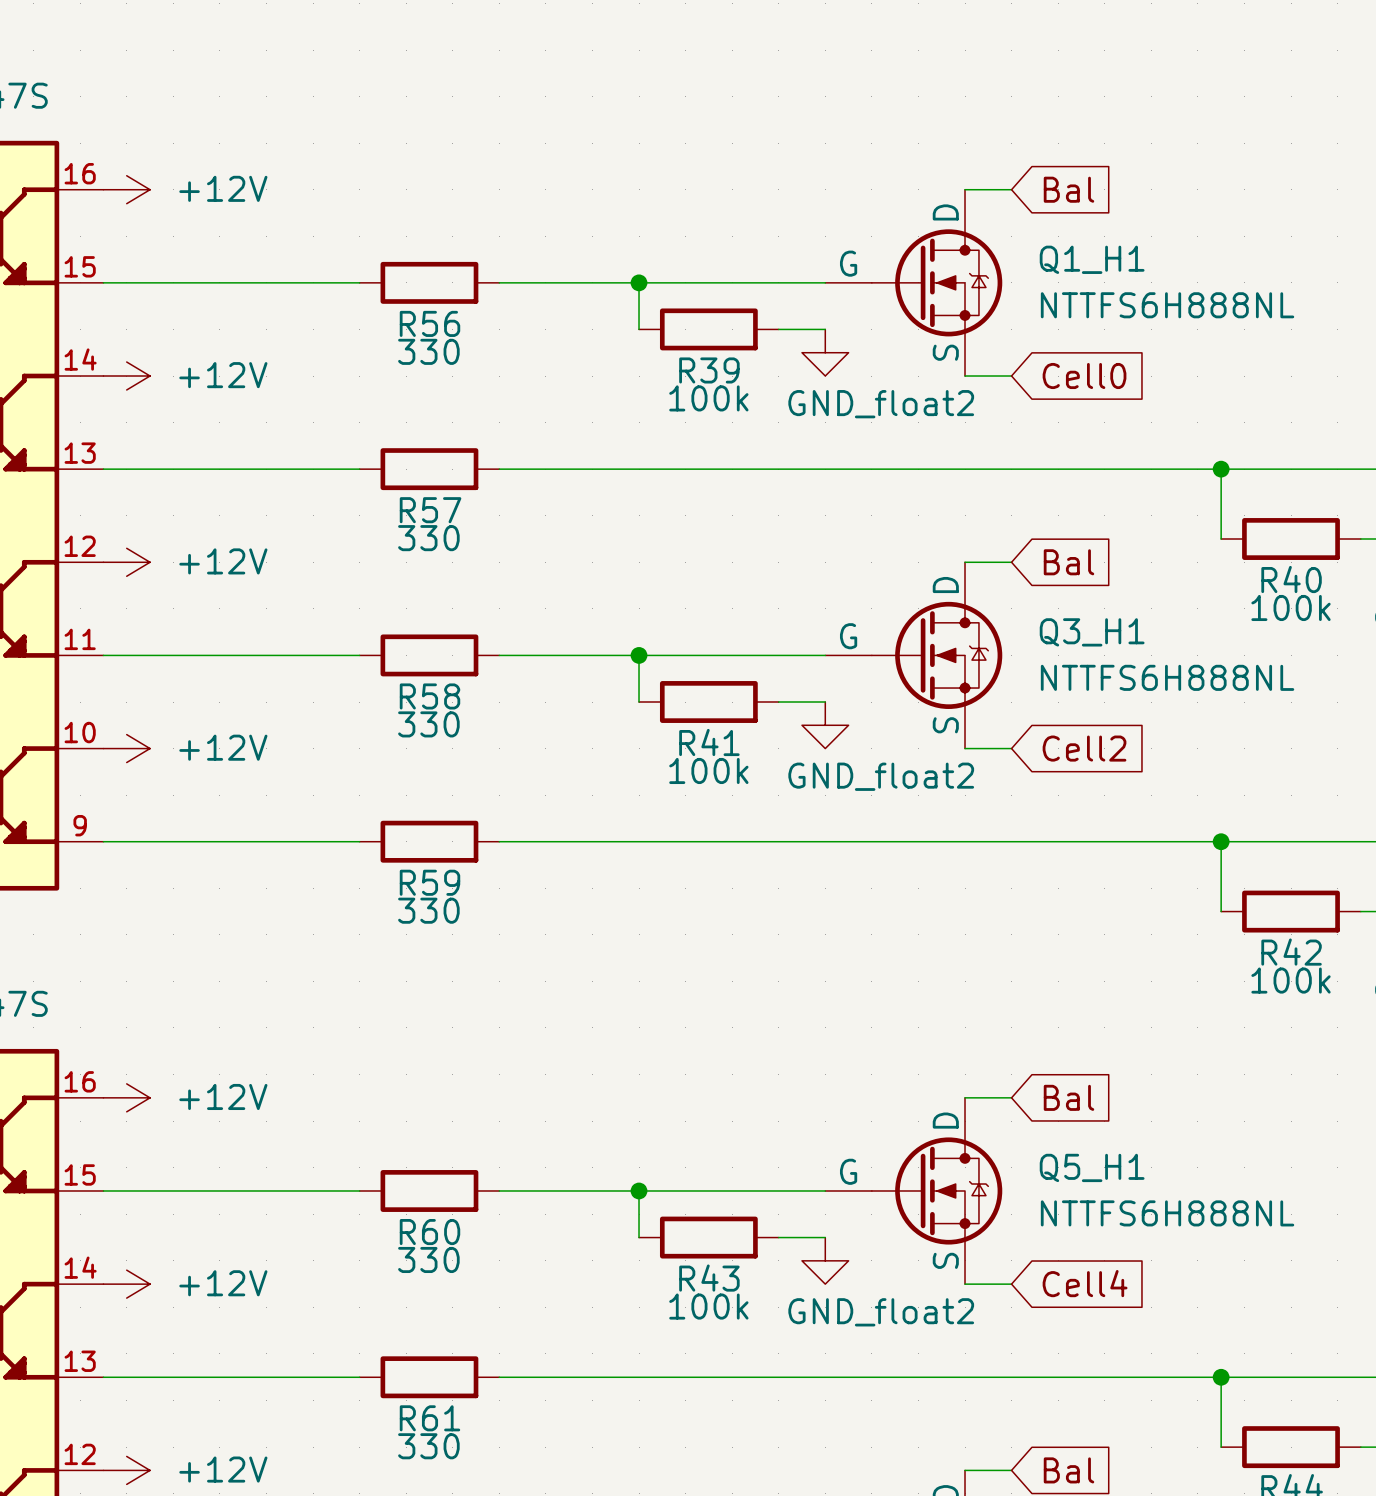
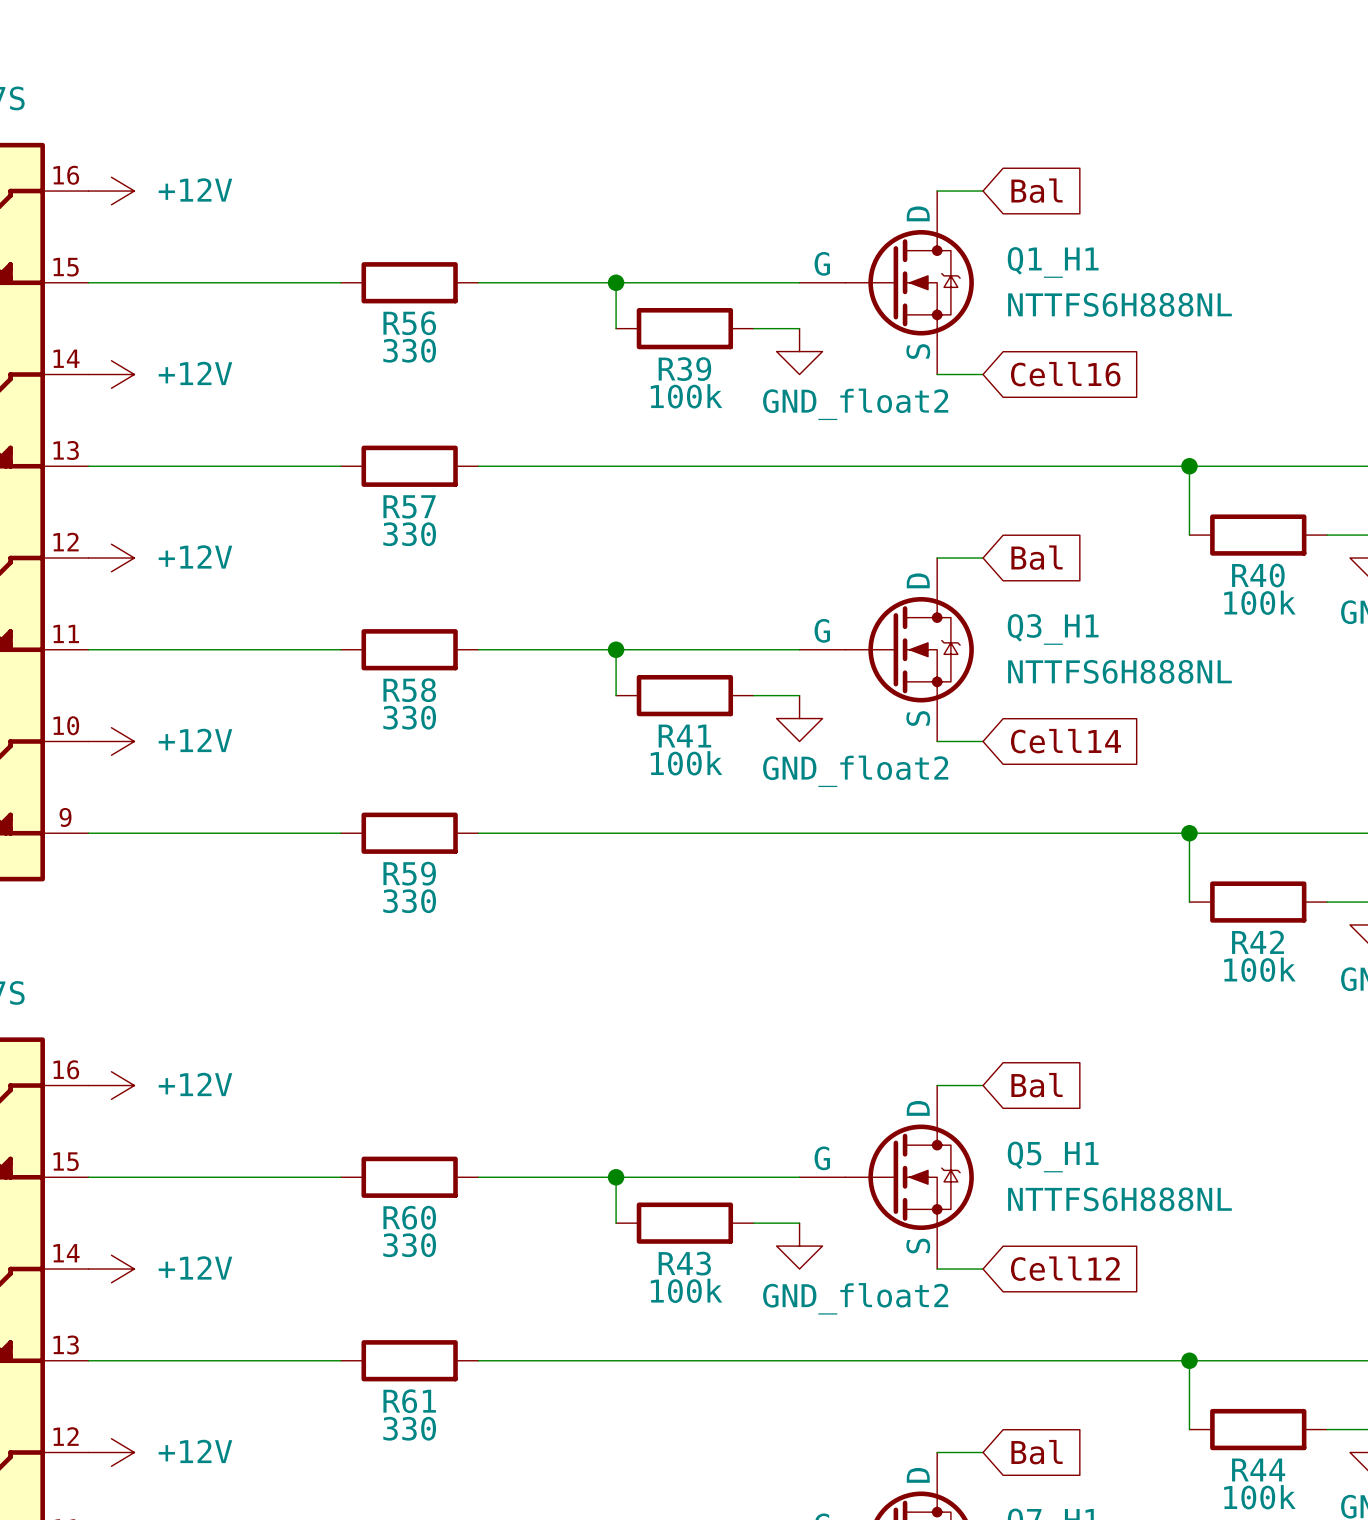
global label: Cell0 (1084, 376) -> Cell16 (1065, 374)
global label: Cell2 (1084, 748) -> Cell14 (1065, 741)
global label: Cell4 (1085, 1283) -> Cell12 (1065, 1268)

